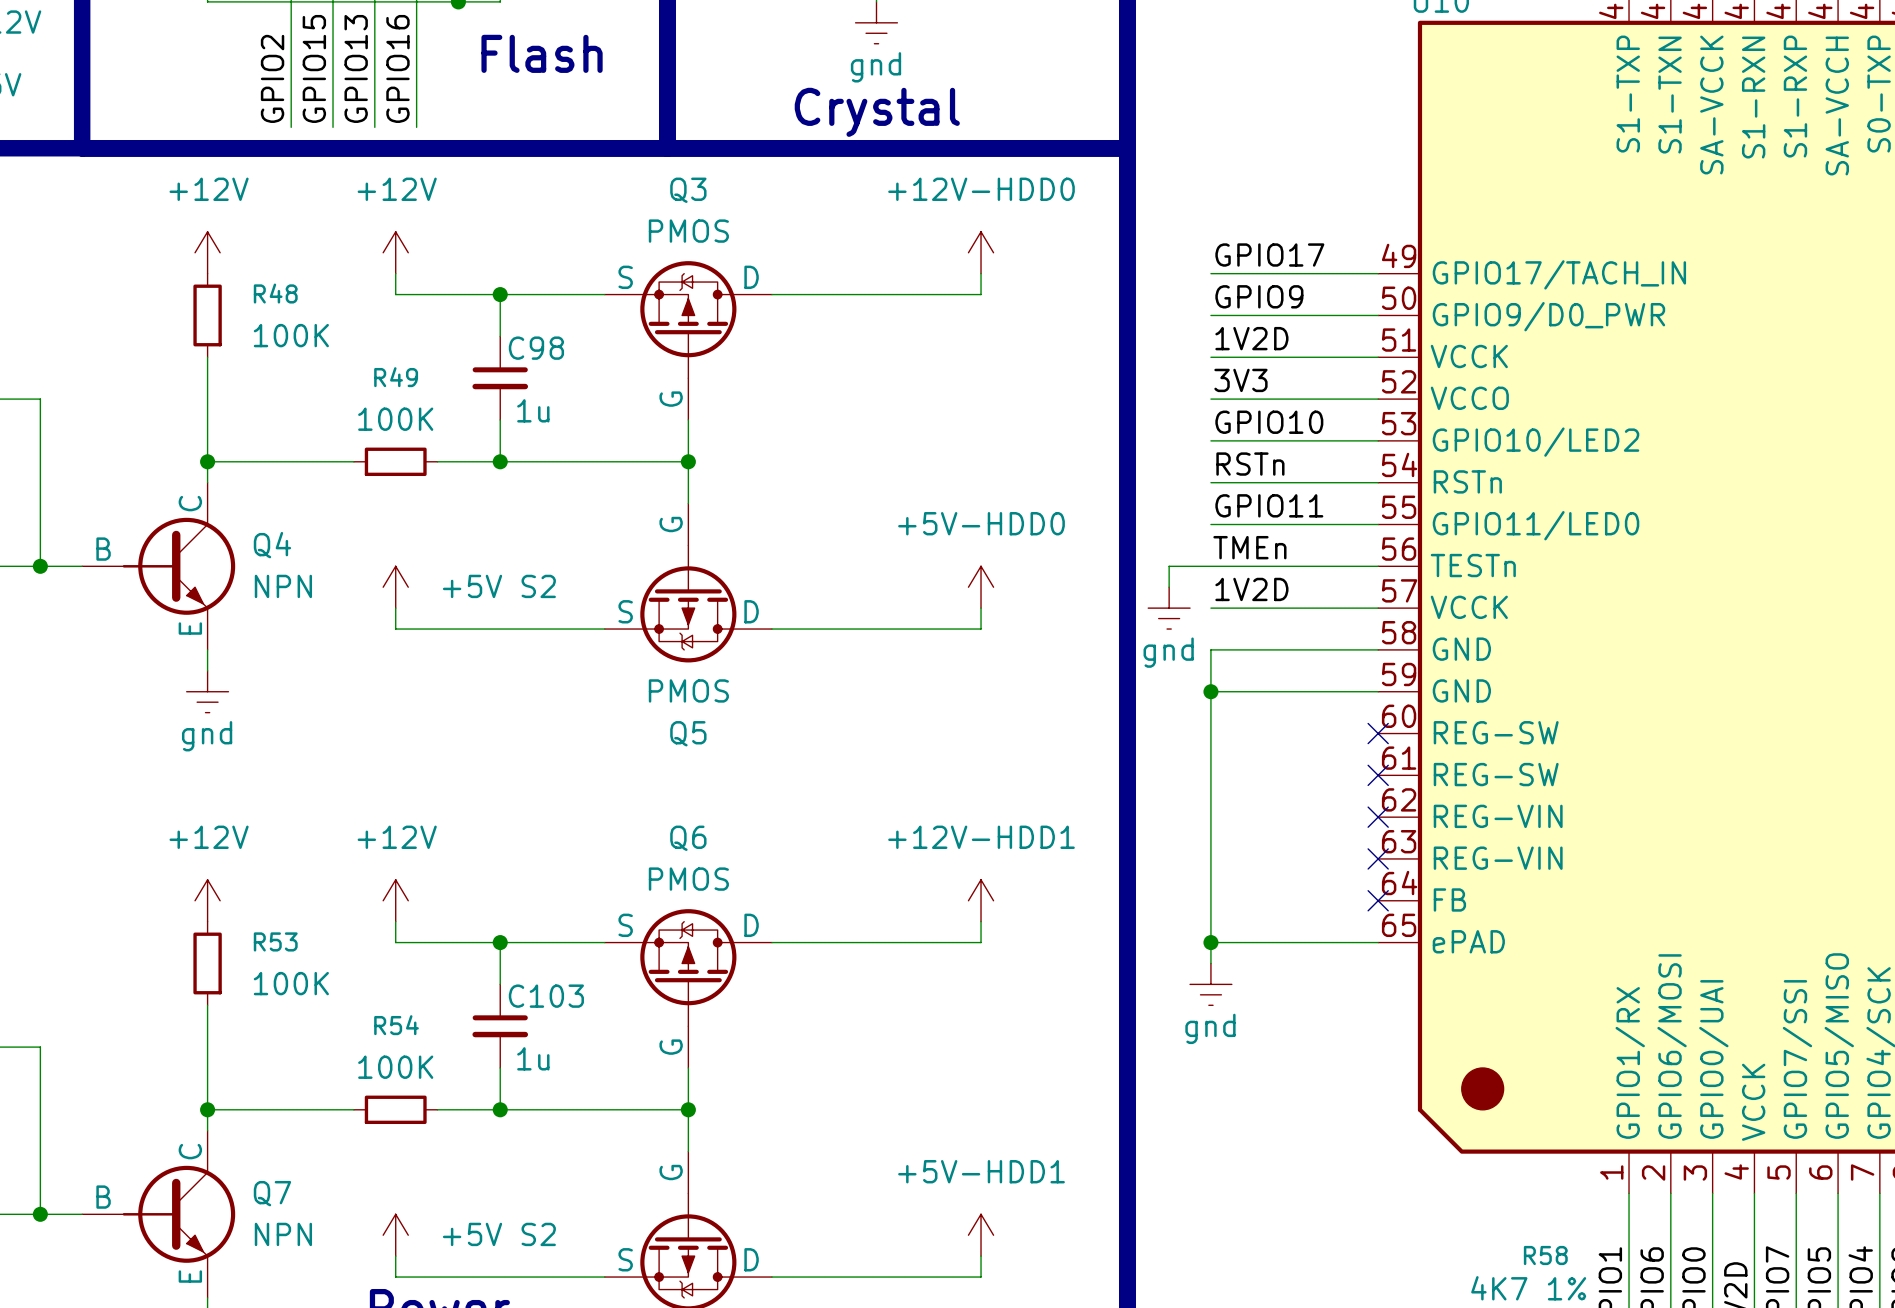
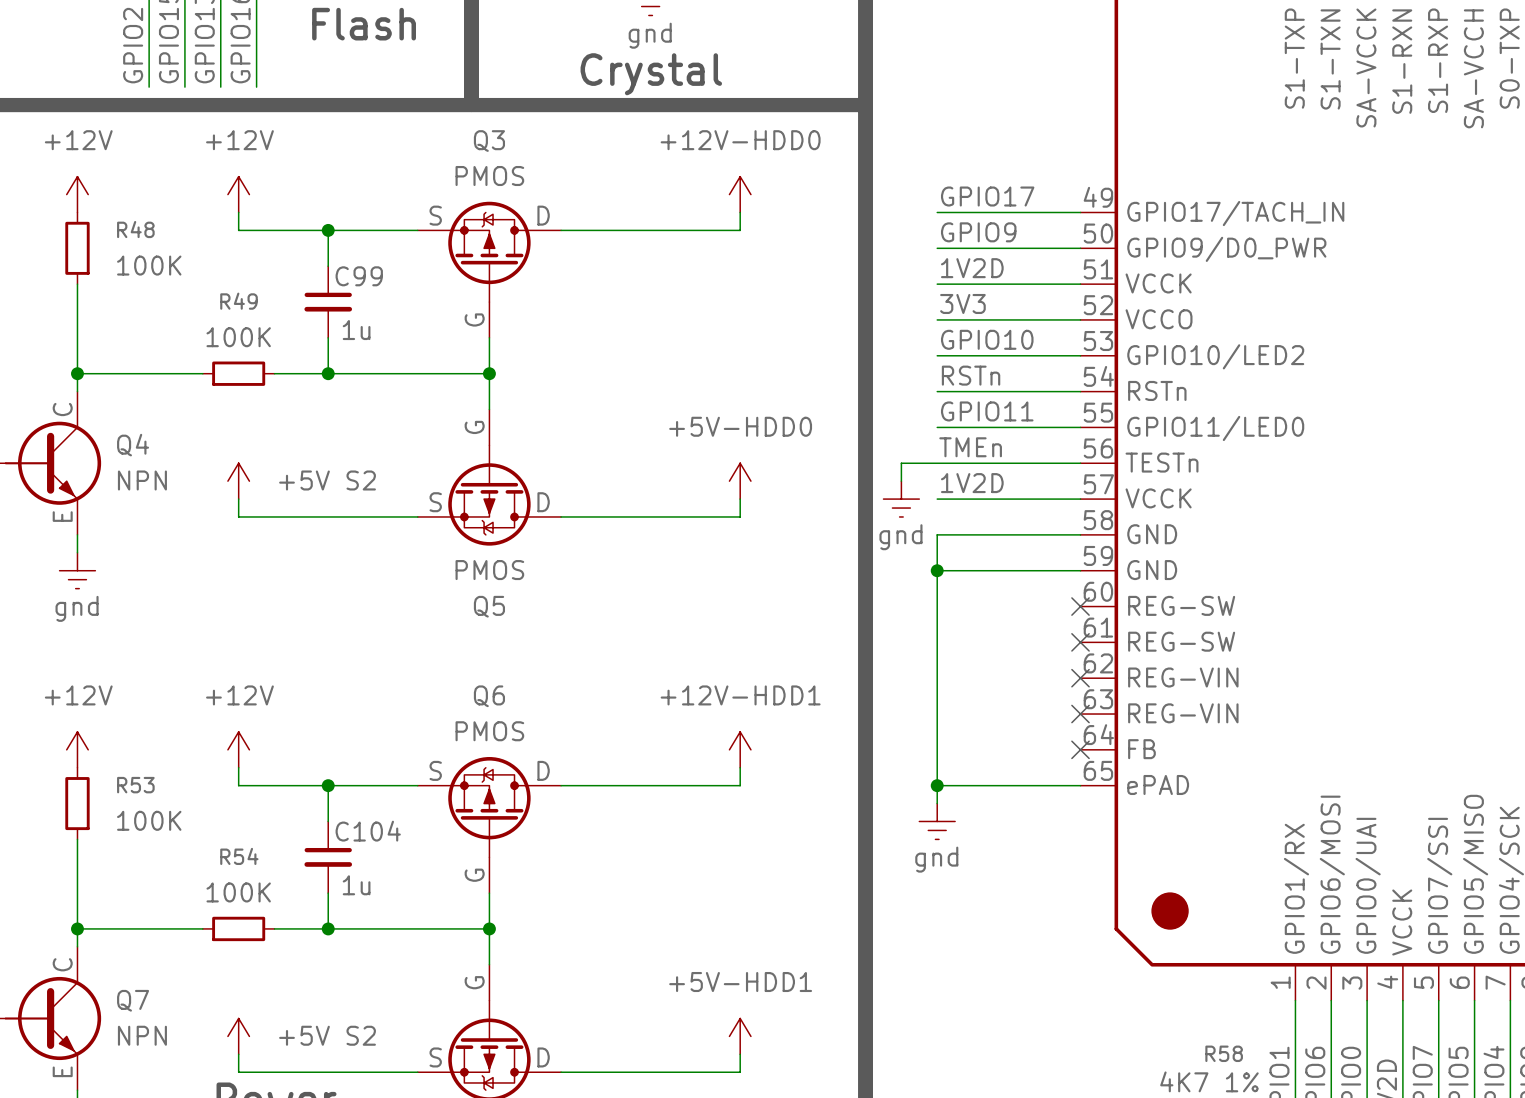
C98 name: C98 (536, 348) -> C99 (359, 276)
C103 name: C103 (546, 996) -> C104 (368, 831)

